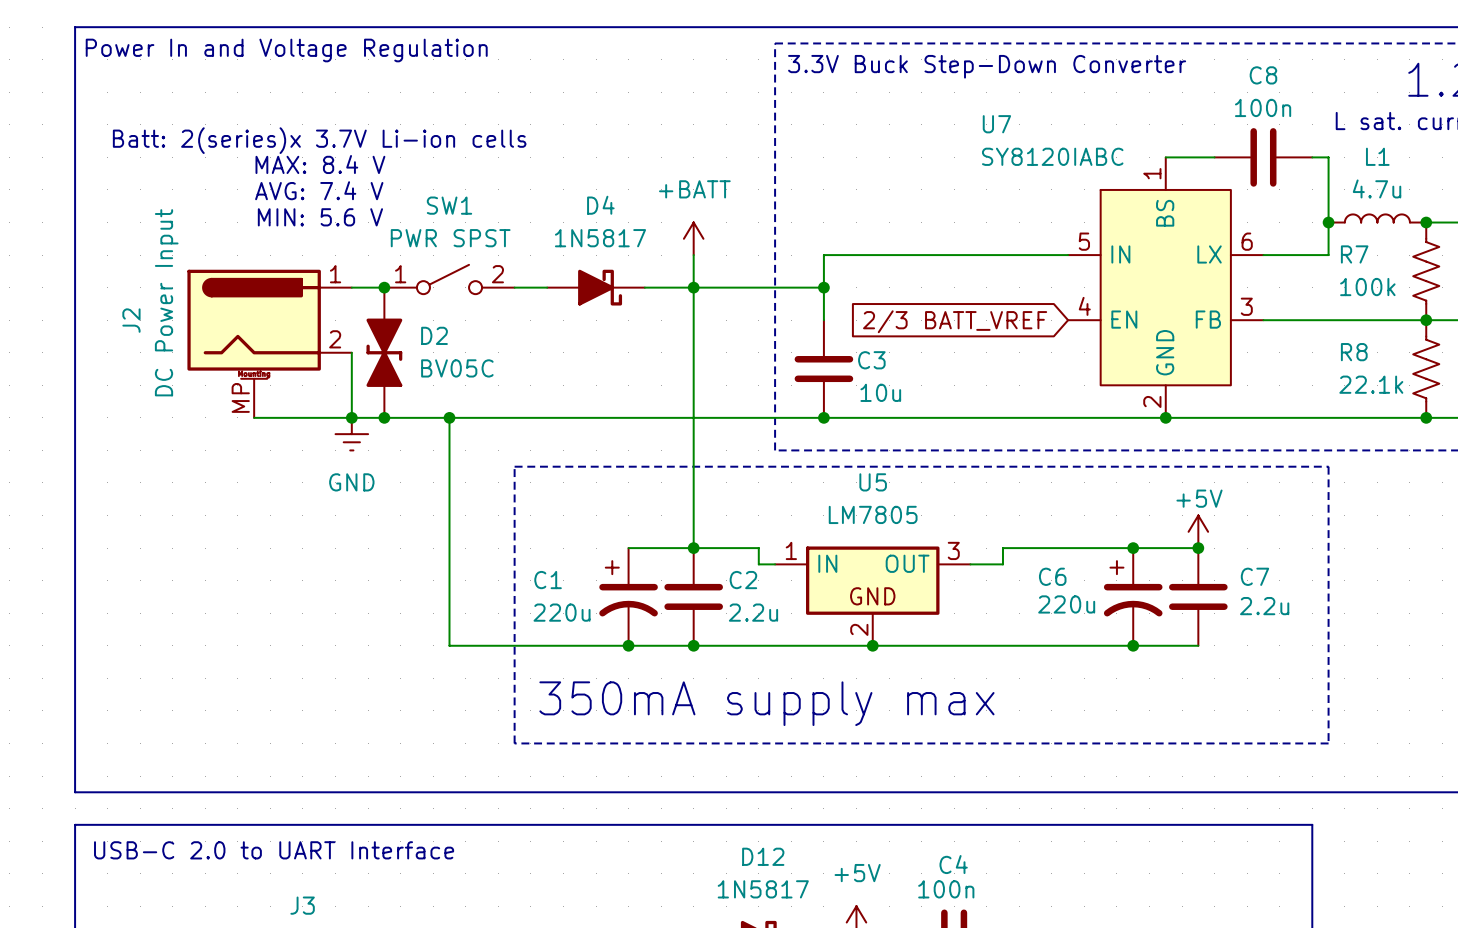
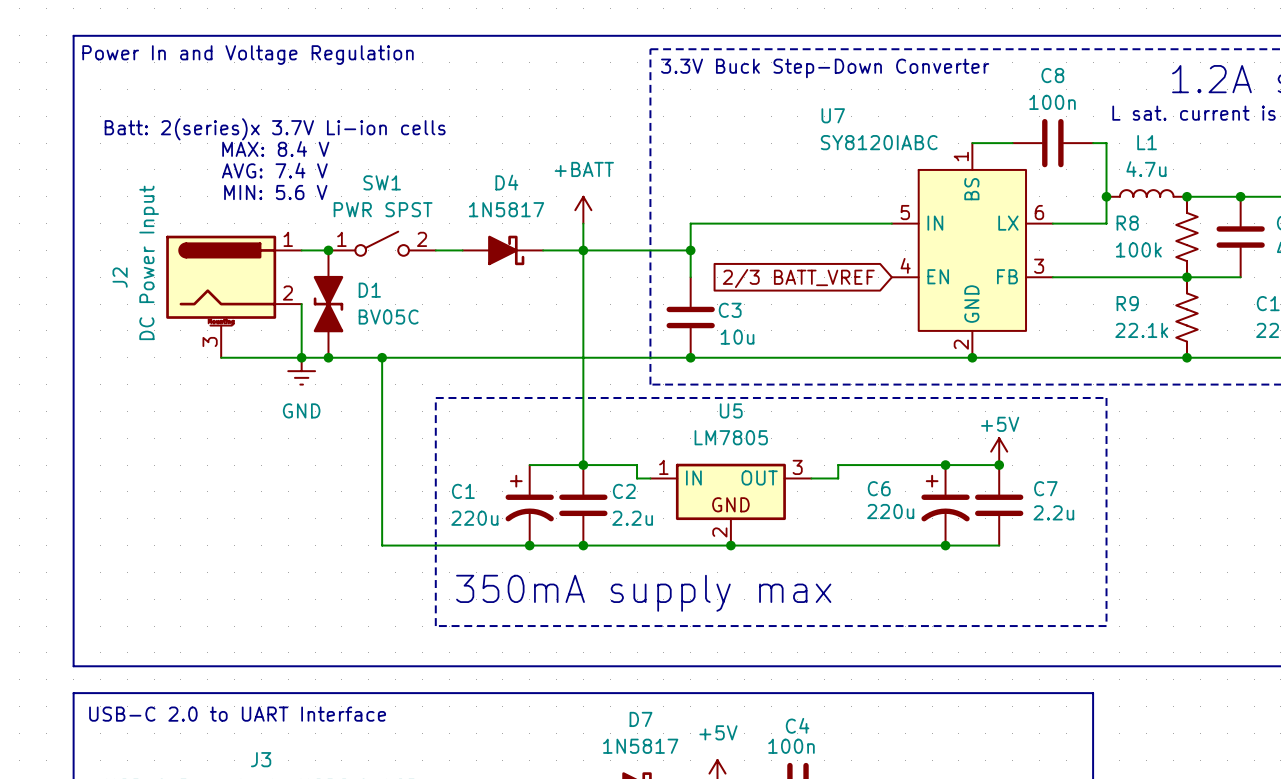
R7 name: R7 (1354, 254) -> R8 (1127, 223)
D2 name: D2 (434, 335) -> D1 (369, 290)
R8 name: R8 (1354, 352) -> R9 (1127, 303)
J2 pin number: MP (240, 397) -> 3 (210, 341)
D12 name: D12 (763, 856) -> D7 (641, 719)

